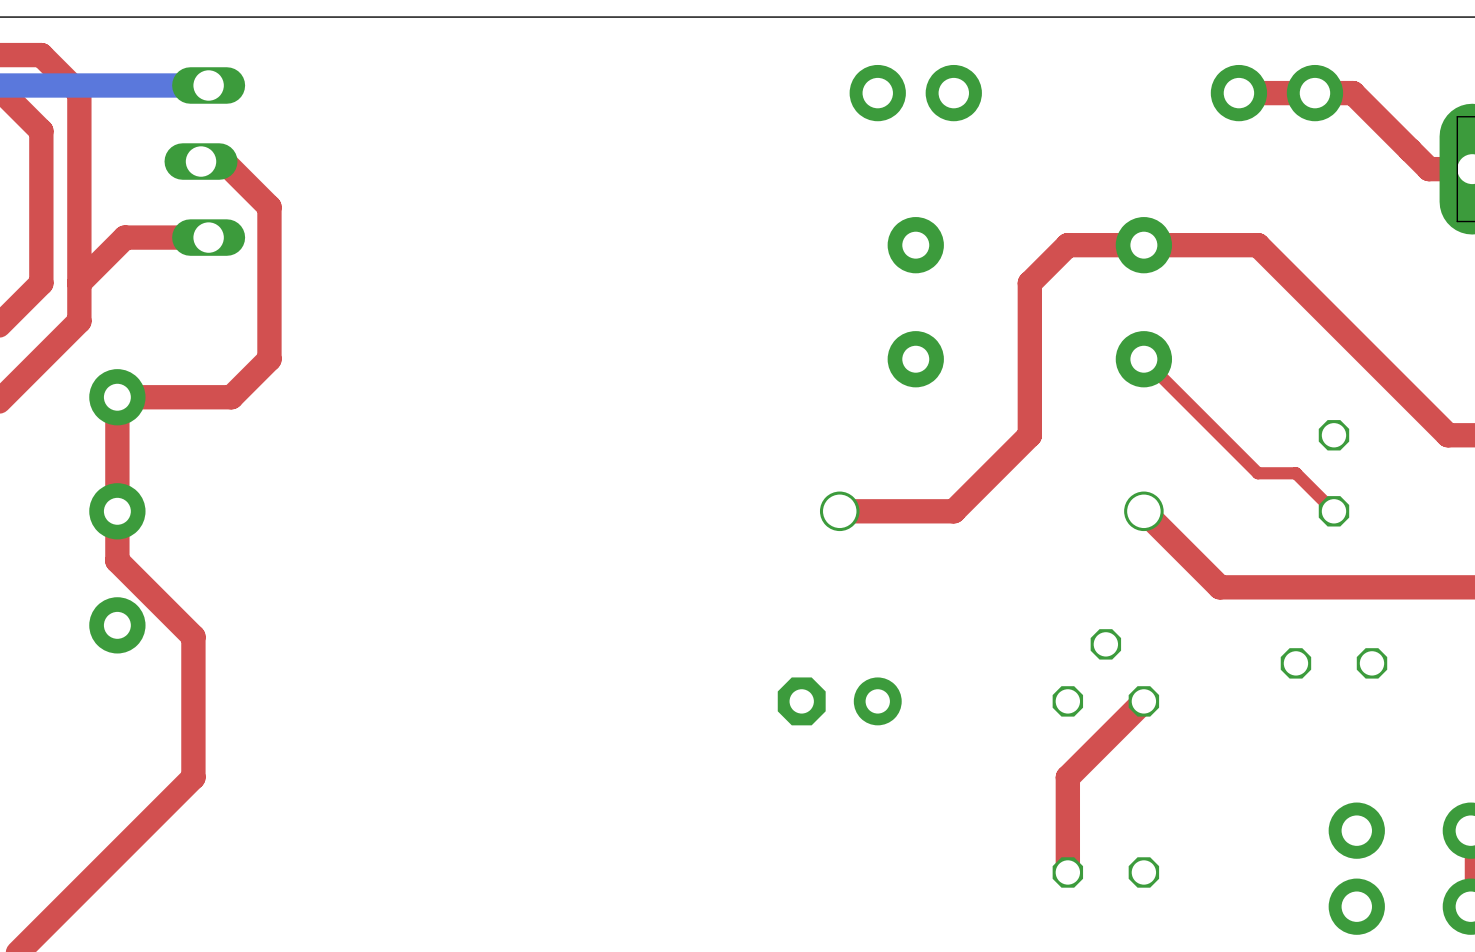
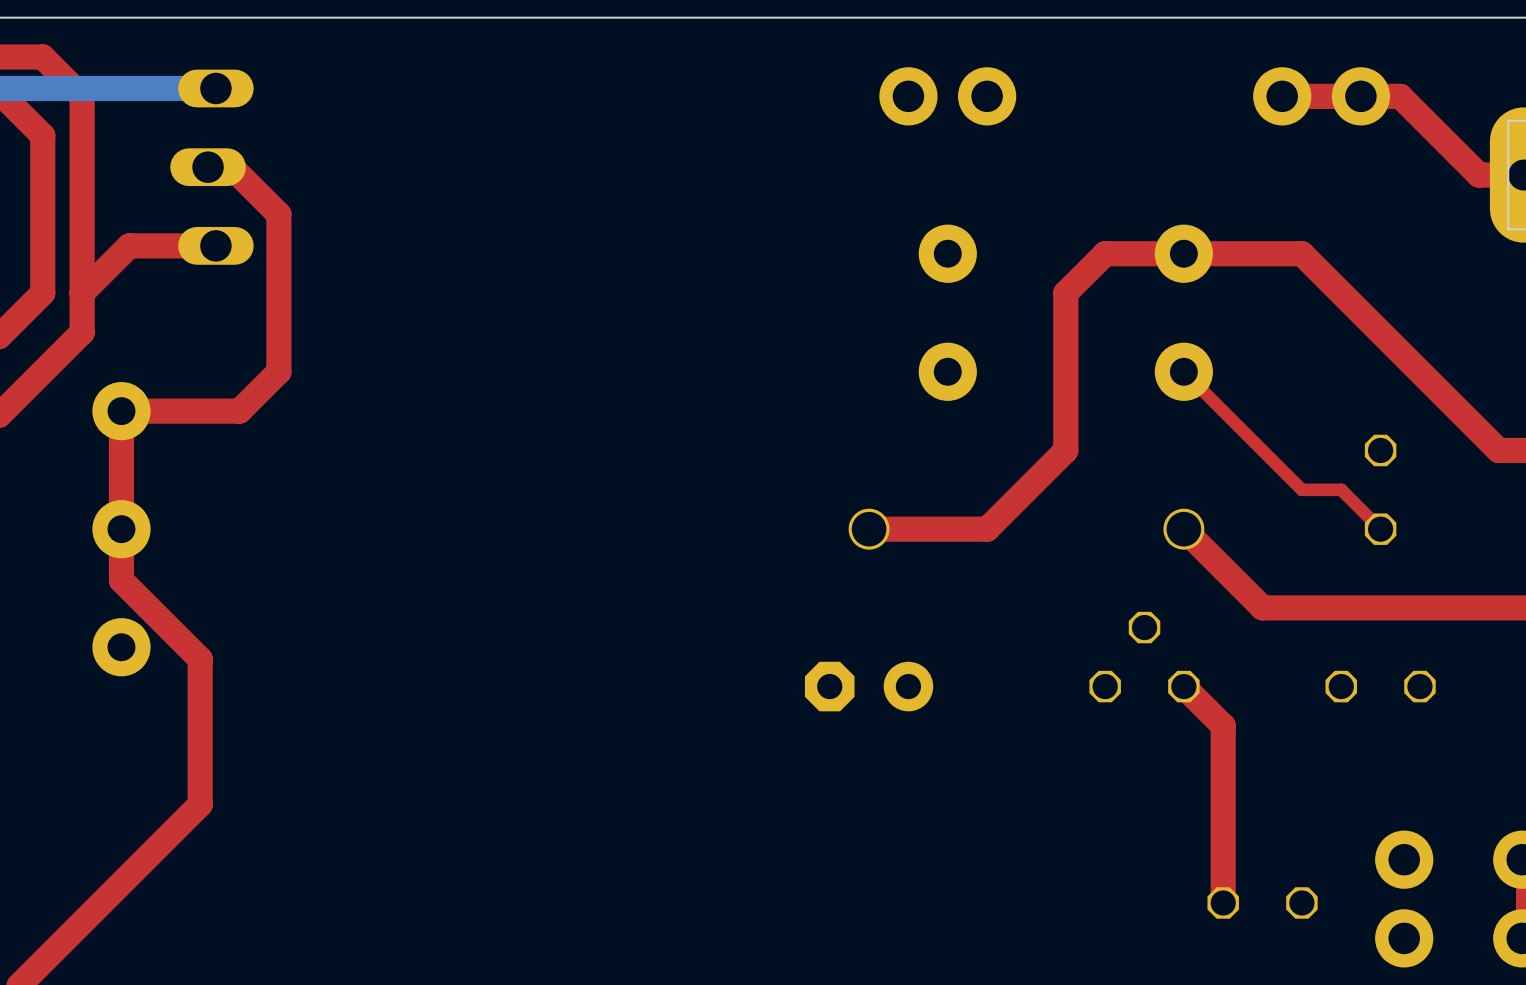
top track: none -> (1183, 686) (1223, 725) (1223, 902)
part position: (1105, 672) -> (1144, 657)
part position: (839, 701) -> (869, 686)
top track: (1143, 701) (1067, 777) (1067, 872) -> none
part position: (1105, 872) -> (1262, 902)

